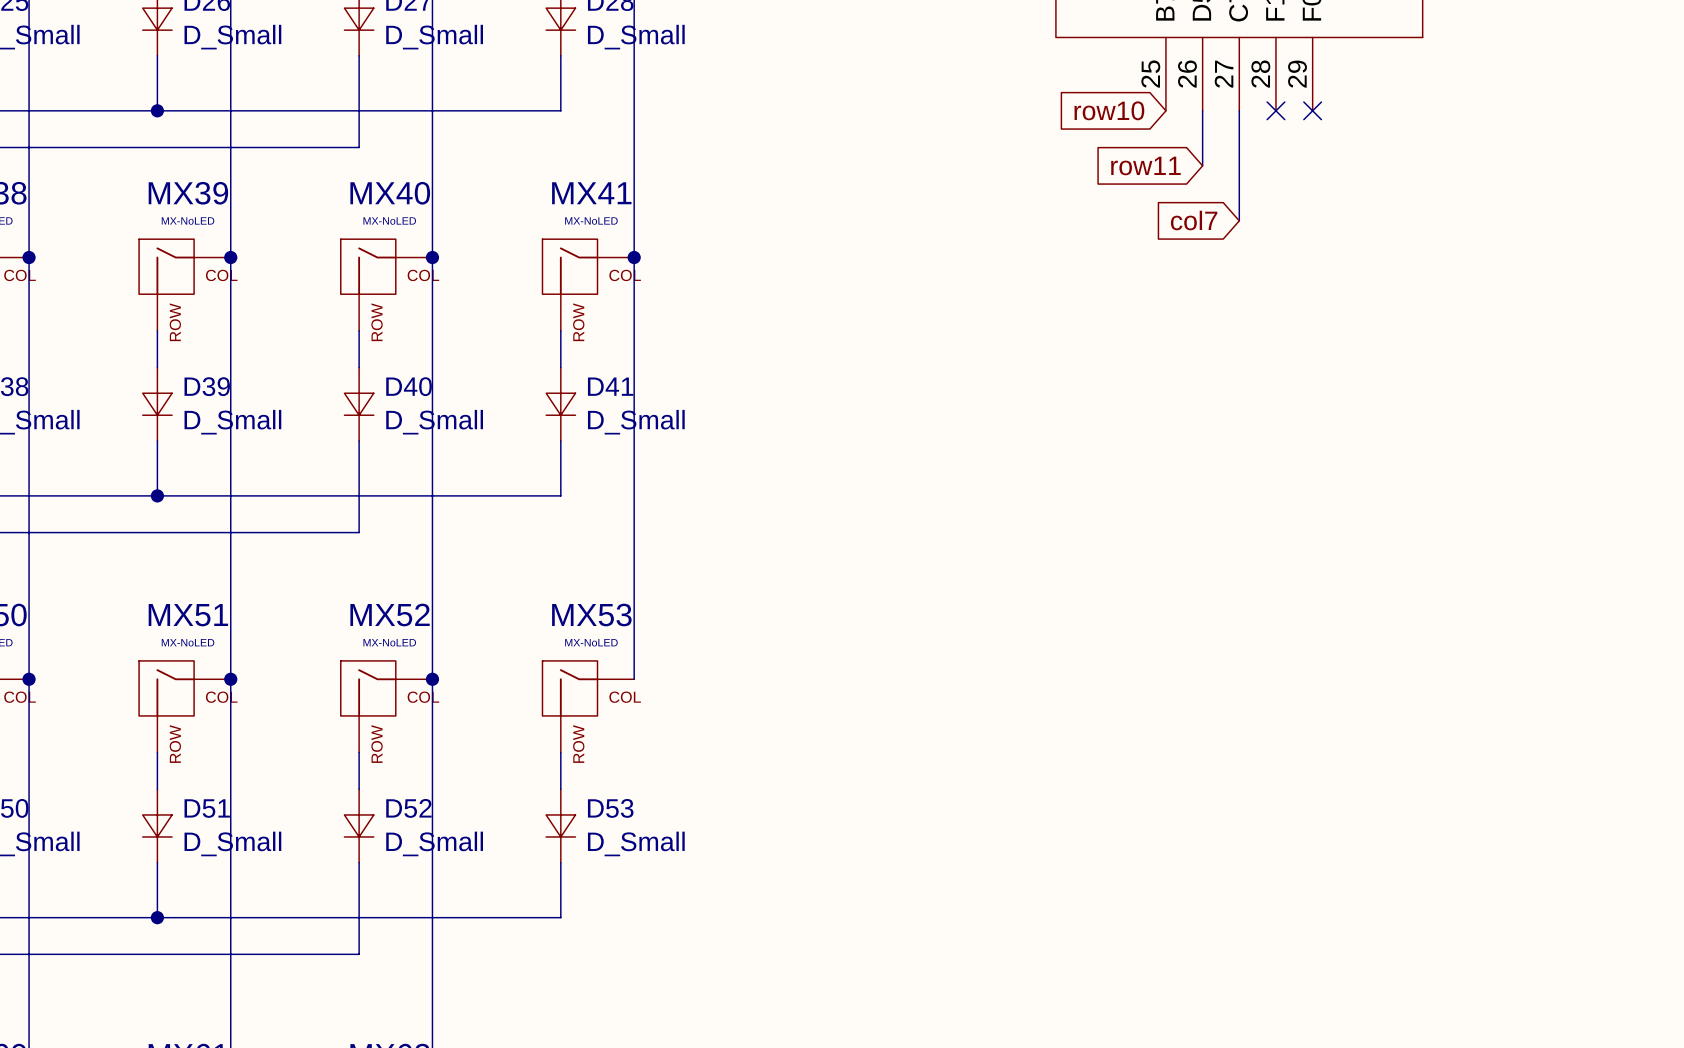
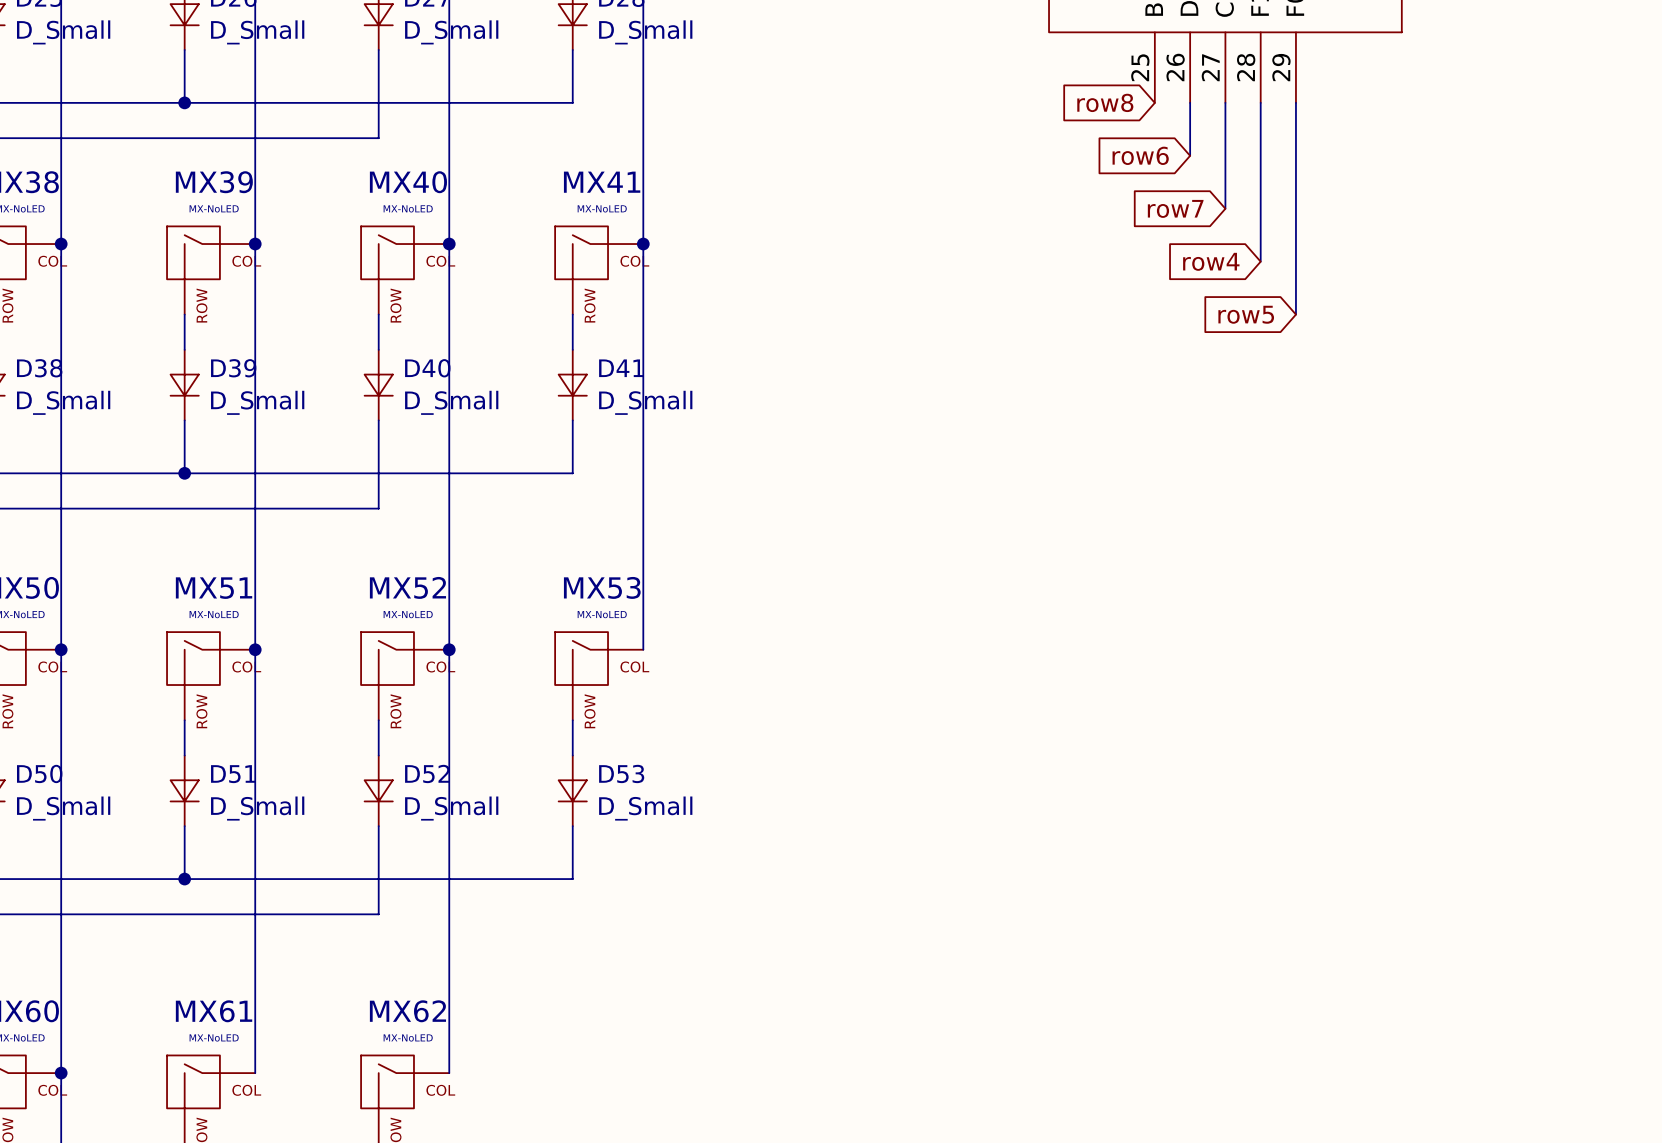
global label: row10 (1109, 110) -> row8 (1105, 102)
wire: none -> (1260, 102) (1260, 261)
no-connect mark: (1275, 110) -> none
wire: none -> (1295, 102) (1295, 314)
no-connect mark: (1312, 110) -> none
global label: row11 (1145, 165) -> row6 (1140, 155)
global label: col7 (1194, 220) -> row7 (1175, 208)
global label: none -> row4 (1211, 261)
global label: none -> row5 (1246, 314)

